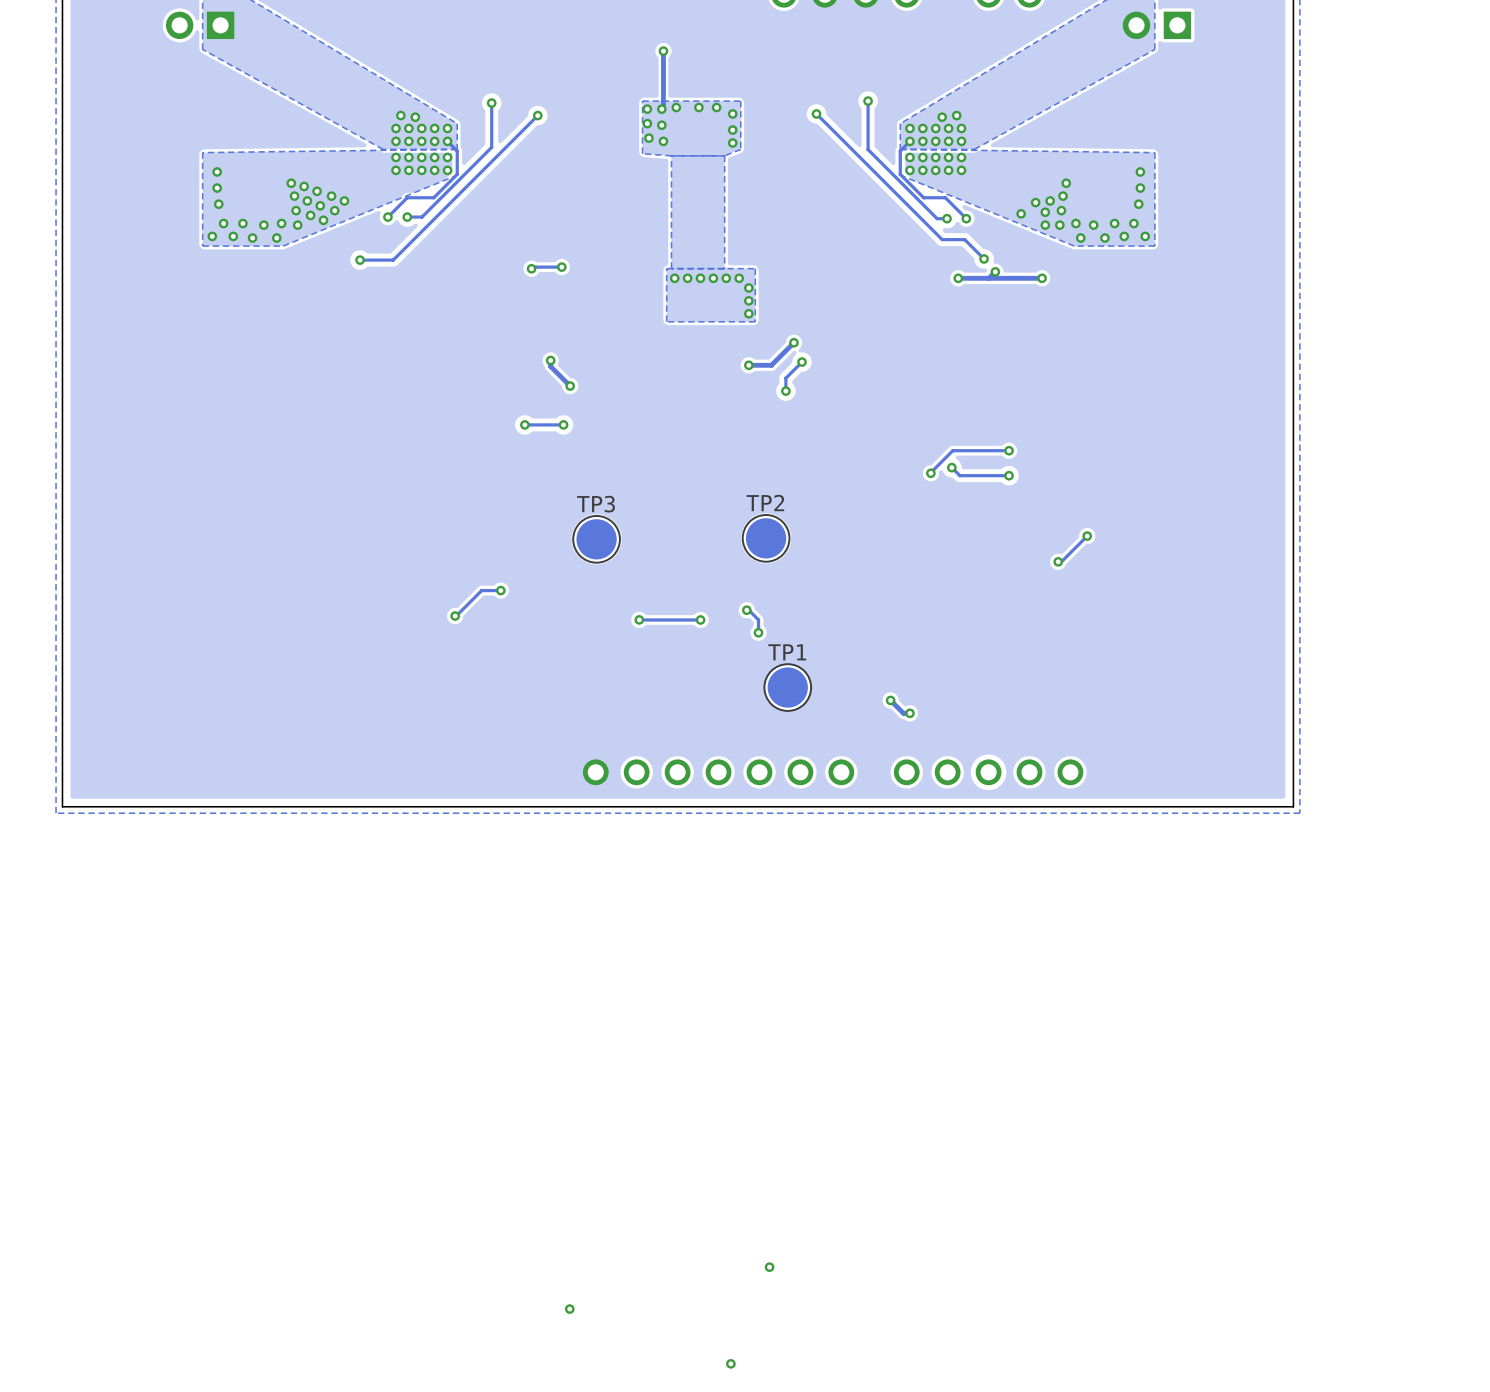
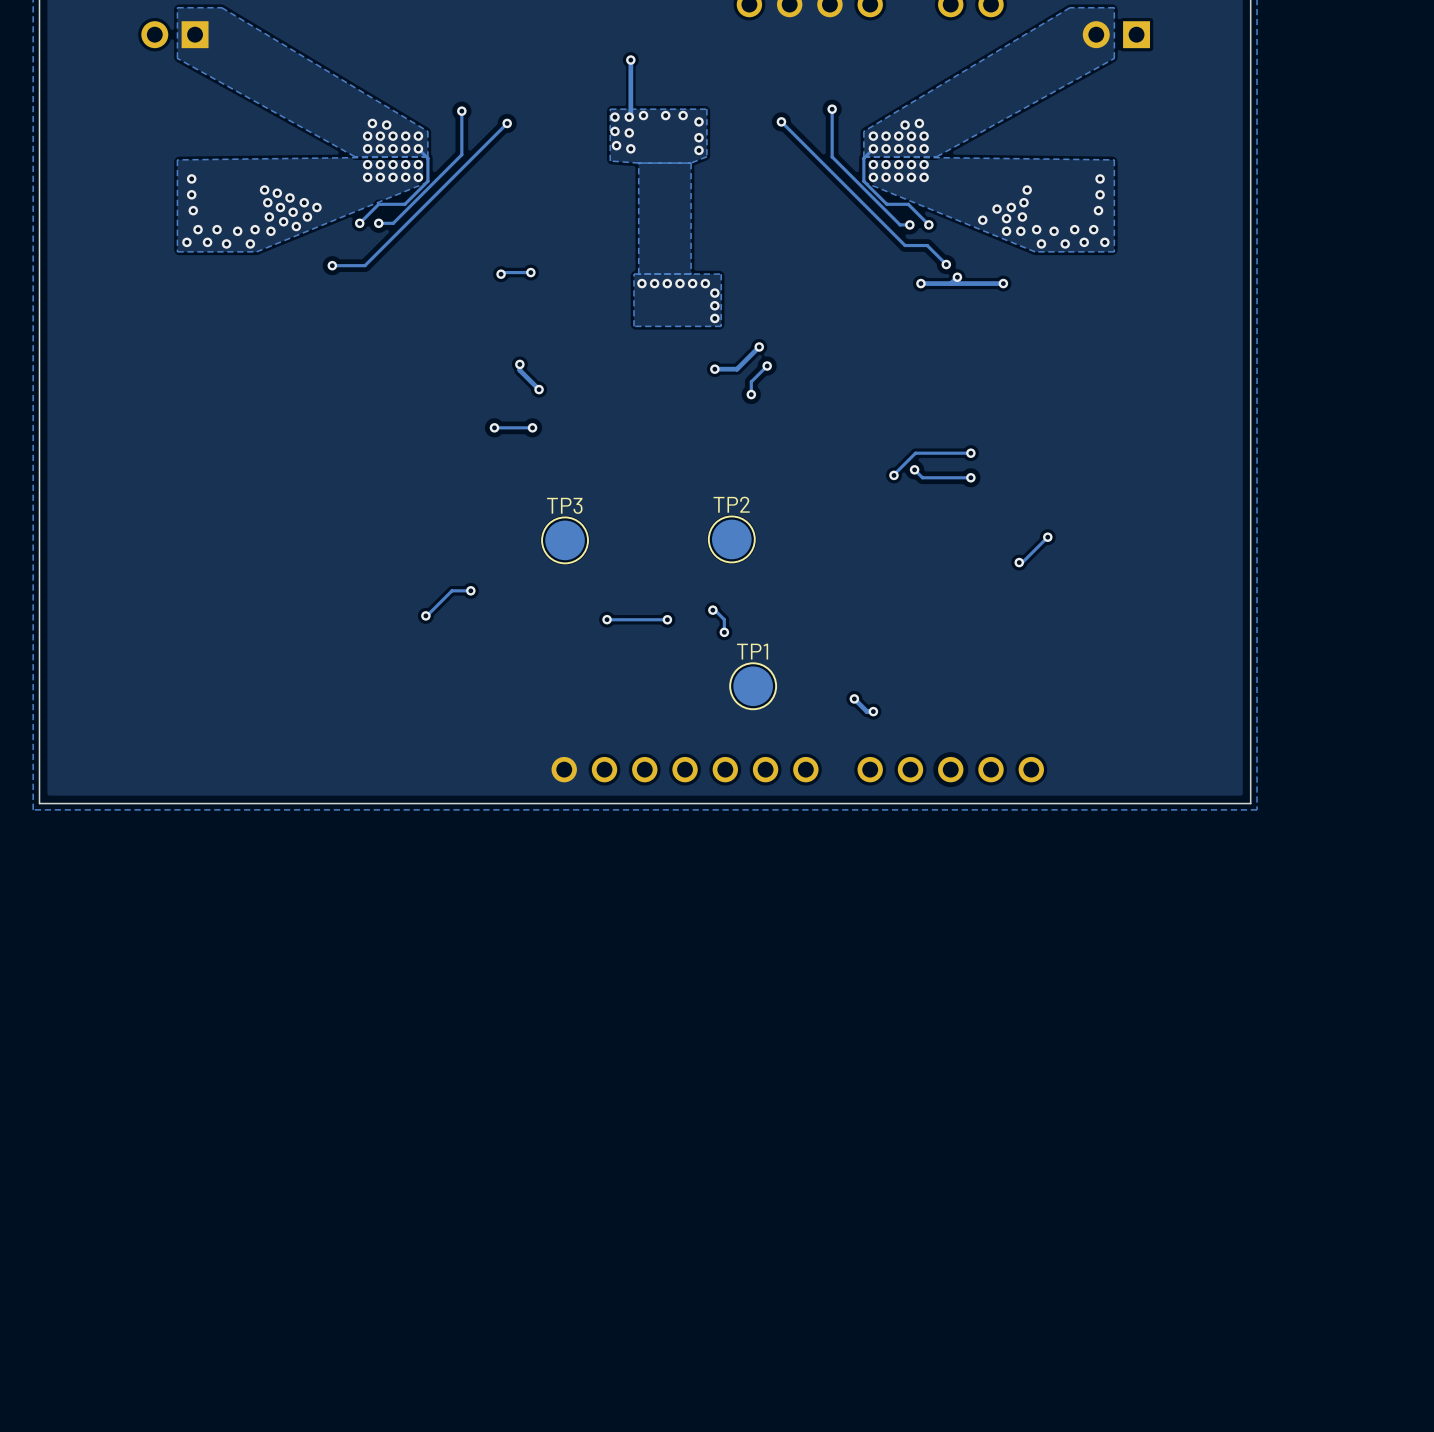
via: (769, 1267) -> none
via: (569, 1309) -> none
via: (730, 1363) -> none

